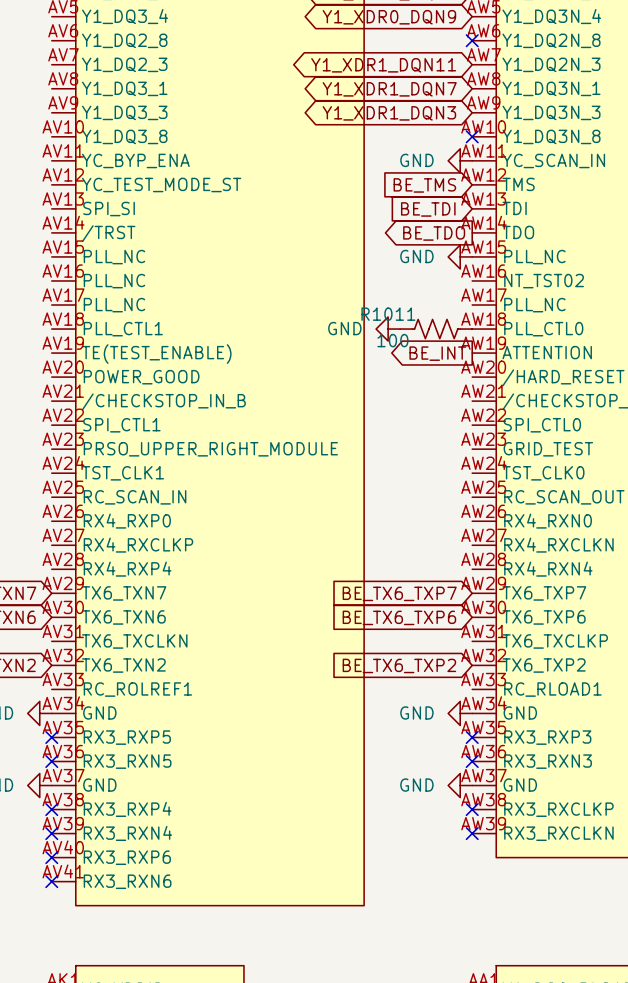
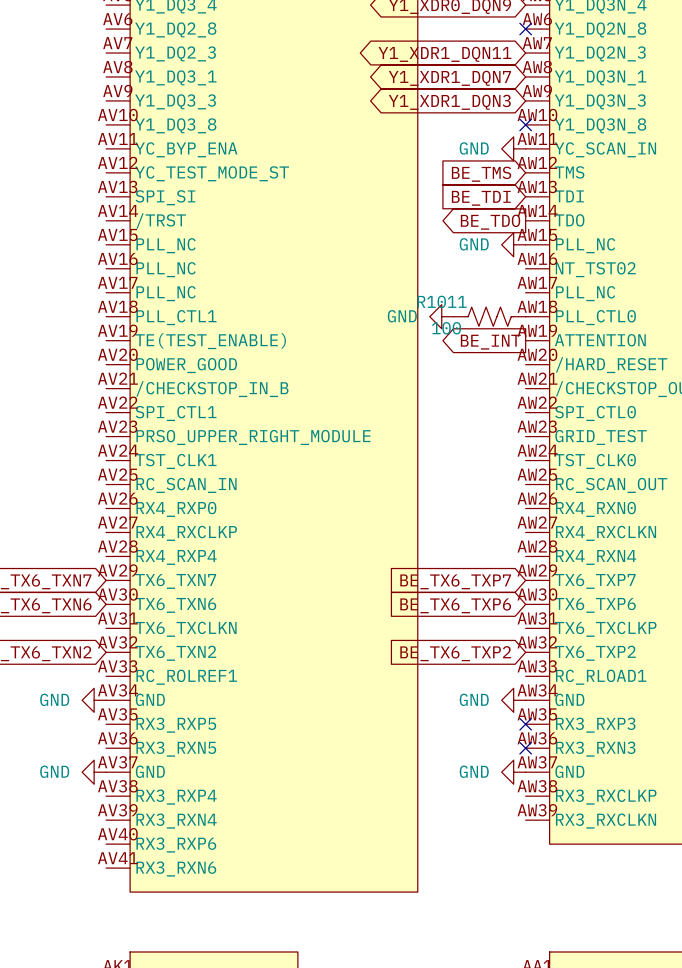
no-connect mark: (51, 737) -> none
no-connect mark: (51, 761) -> none
no-connect mark: (51, 809) -> none
no-connect mark: (472, 809) -> none
no-connect mark: (51, 833) -> none
no-connect mark: (472, 833) -> none
no-connect mark: (51, 857) -> none
no-connect mark: (51, 881) -> none

